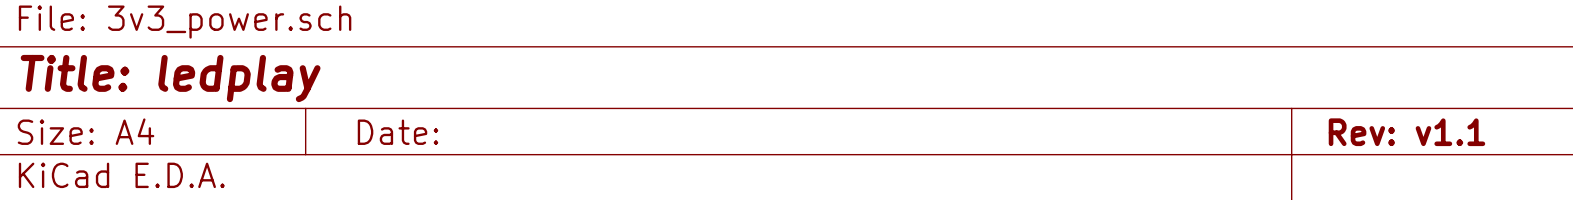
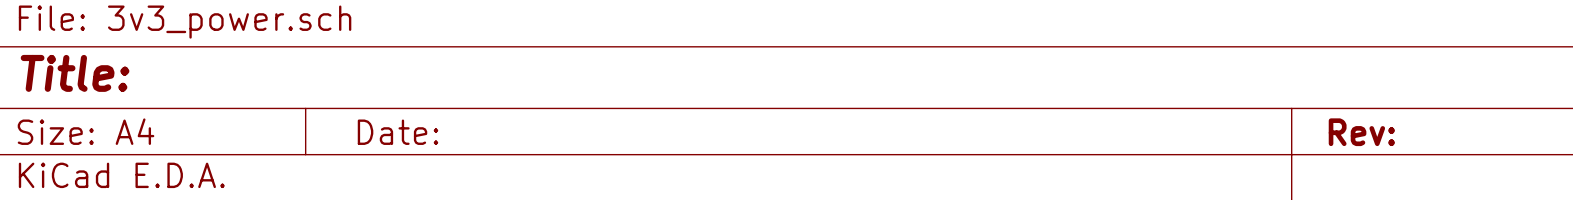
title block: Title: ledplay (170, 78) -> Title: (75, 73)
title block: Rev: v1.1 (1406, 132) -> Rev: (1361, 132)

